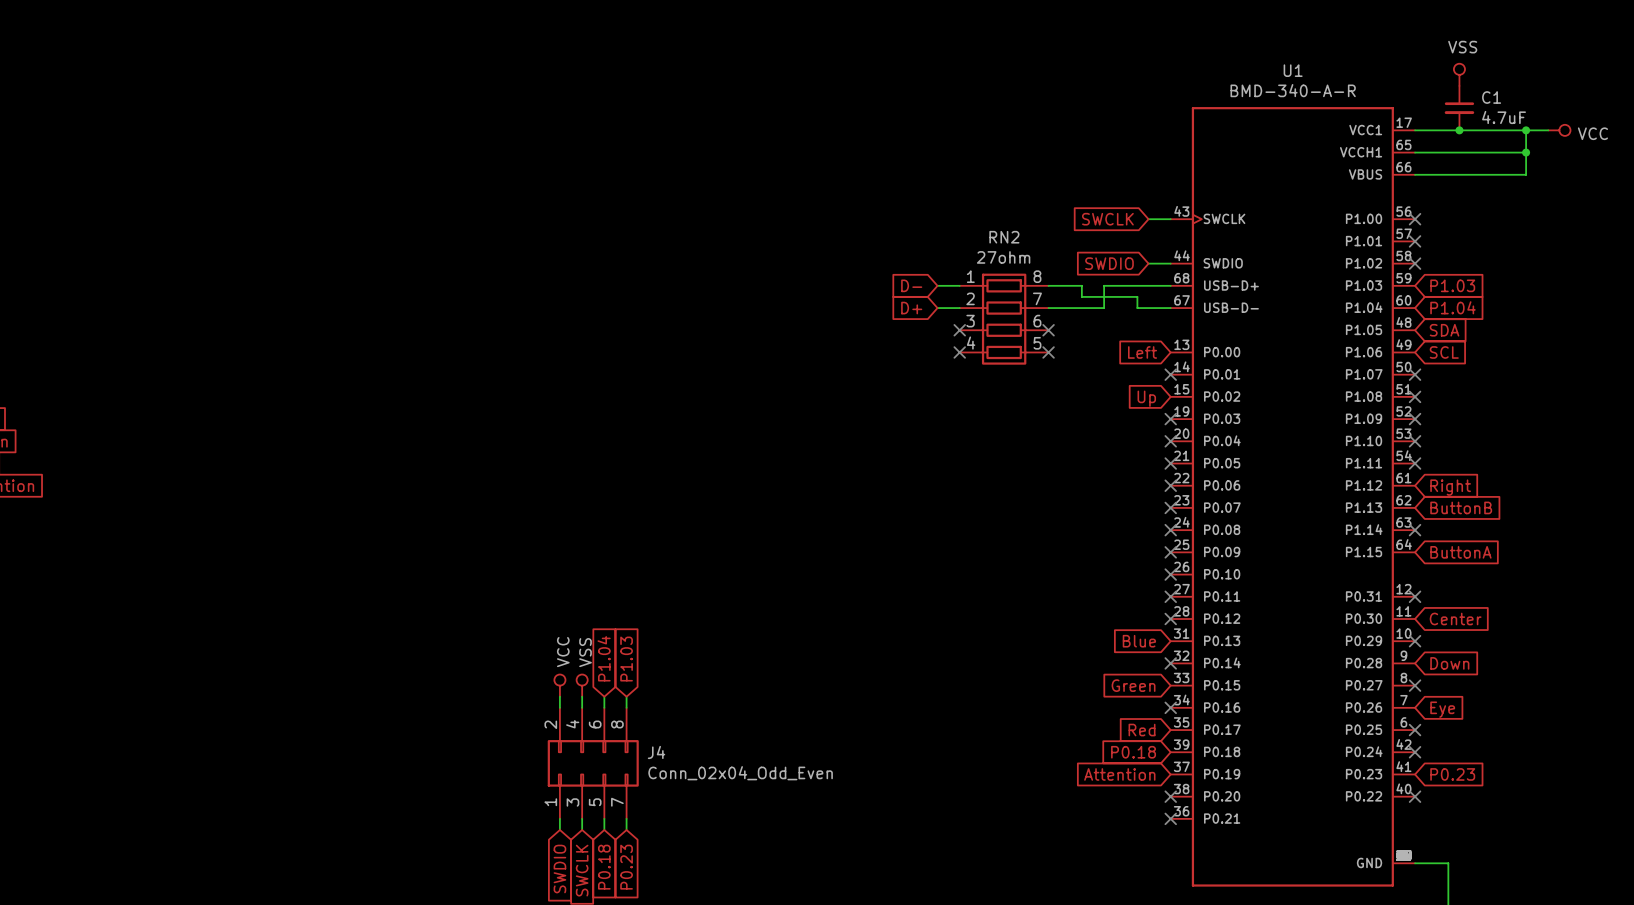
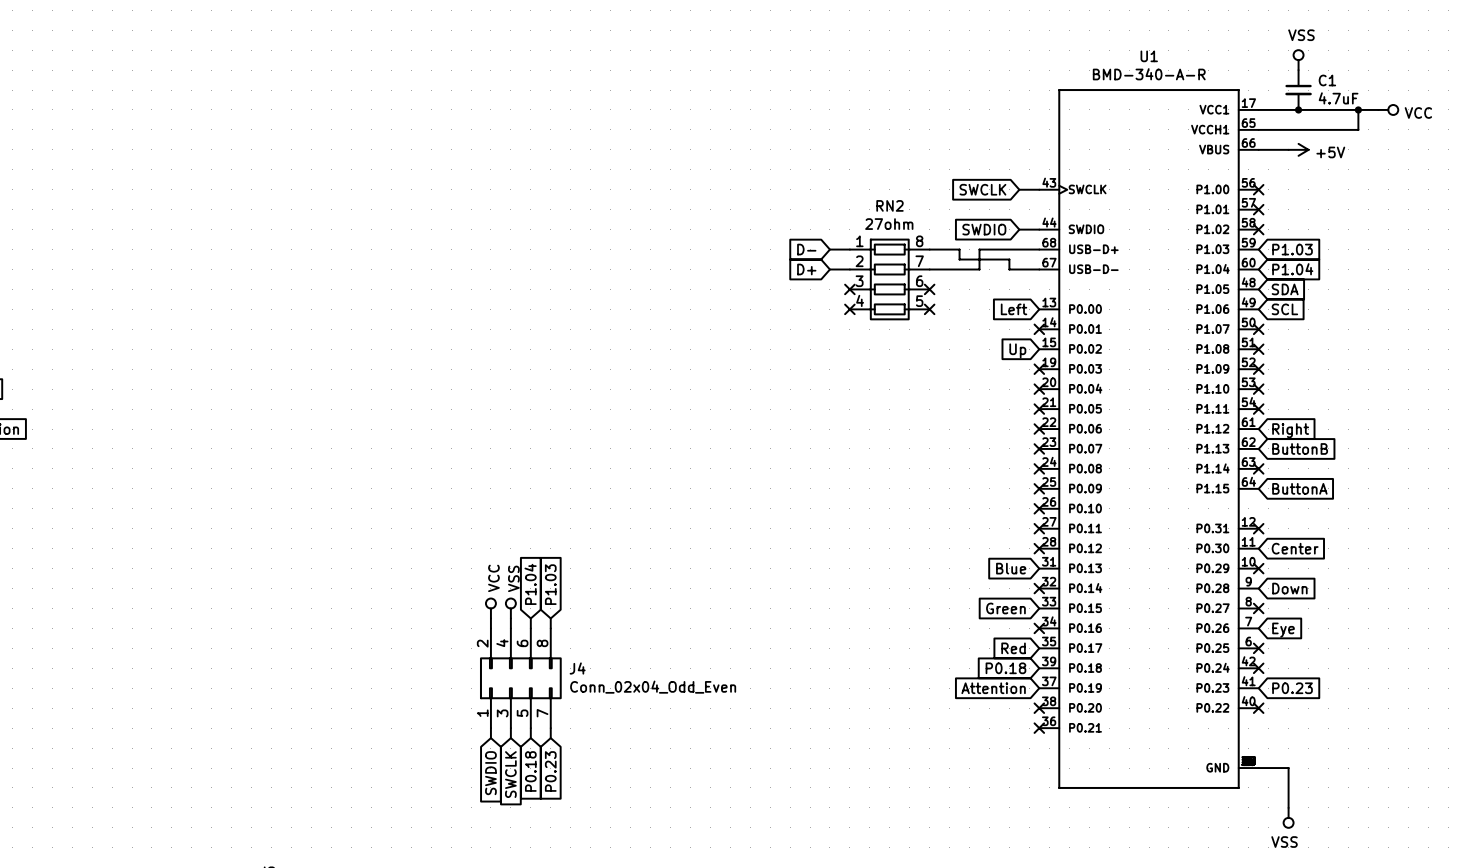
wire: (1526, 152) (1526, 174) (1448, 174) -> none
junction: (1526, 152) -> none
power symbol: none -> +5V (1298, 149)

